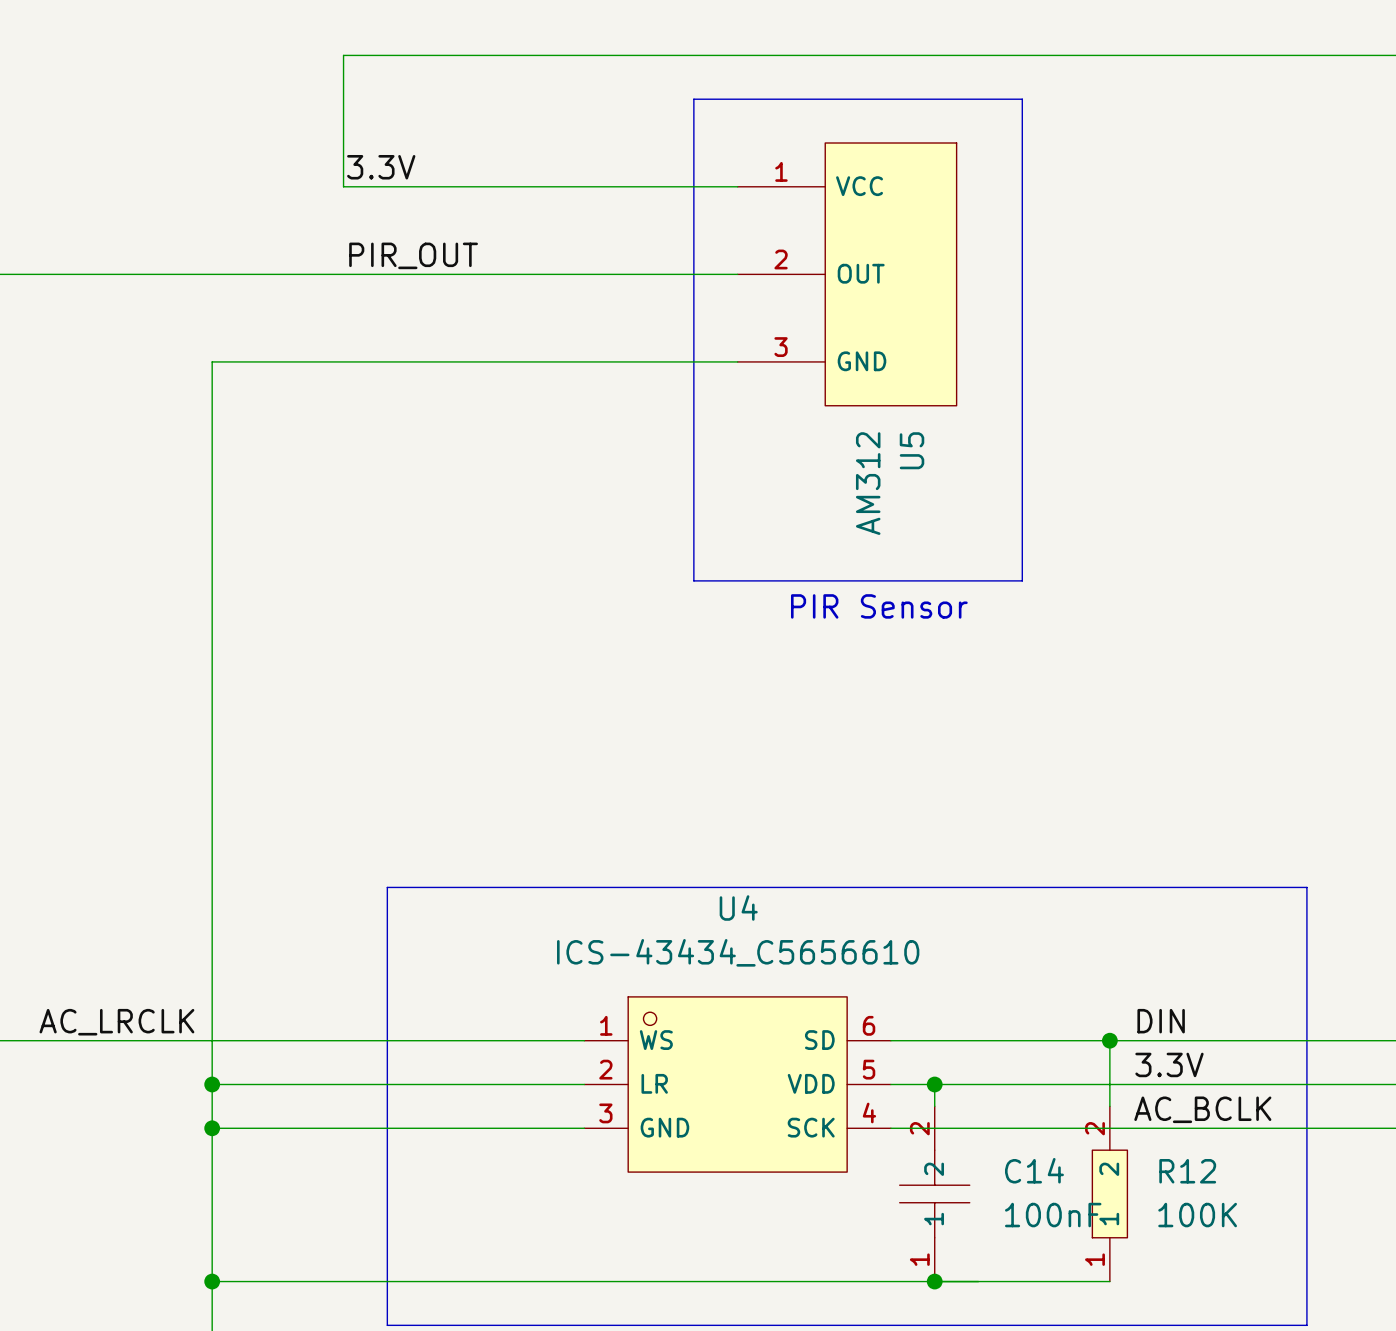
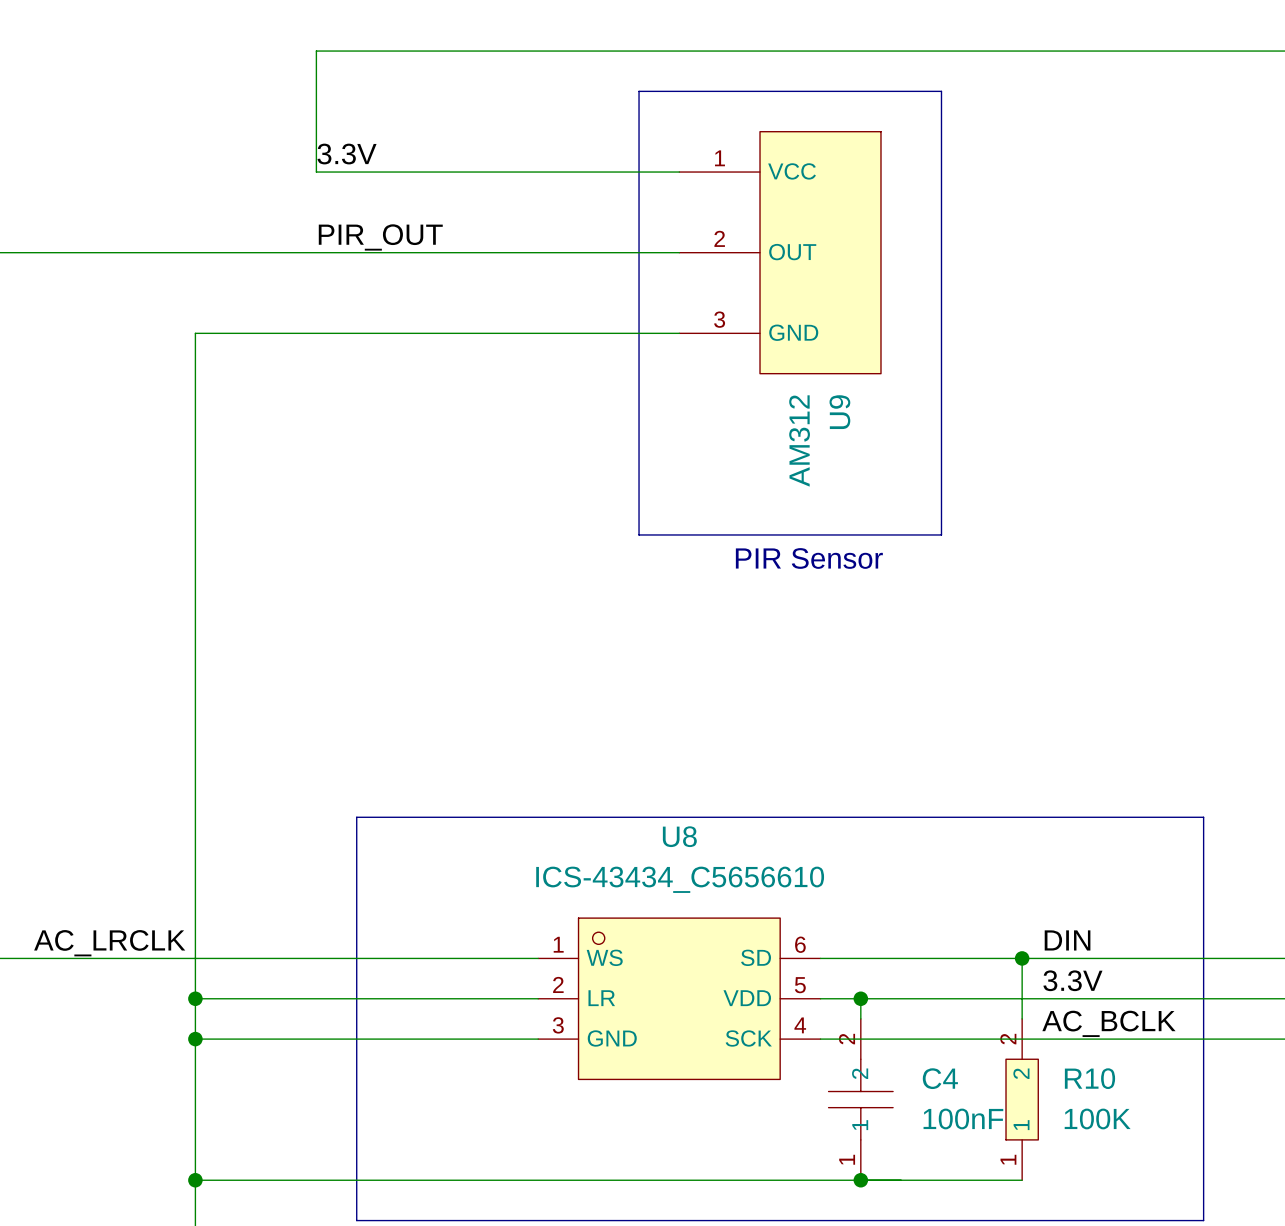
U5 name: U5 (912, 450) -> U9 (839, 412)
U4 name: U4 (738, 907) -> U8 (679, 836)
C14 name: C14 (1034, 1170) -> C4 (940, 1078)
R12 name: R12 (1187, 1171) -> R10 (1089, 1078)

